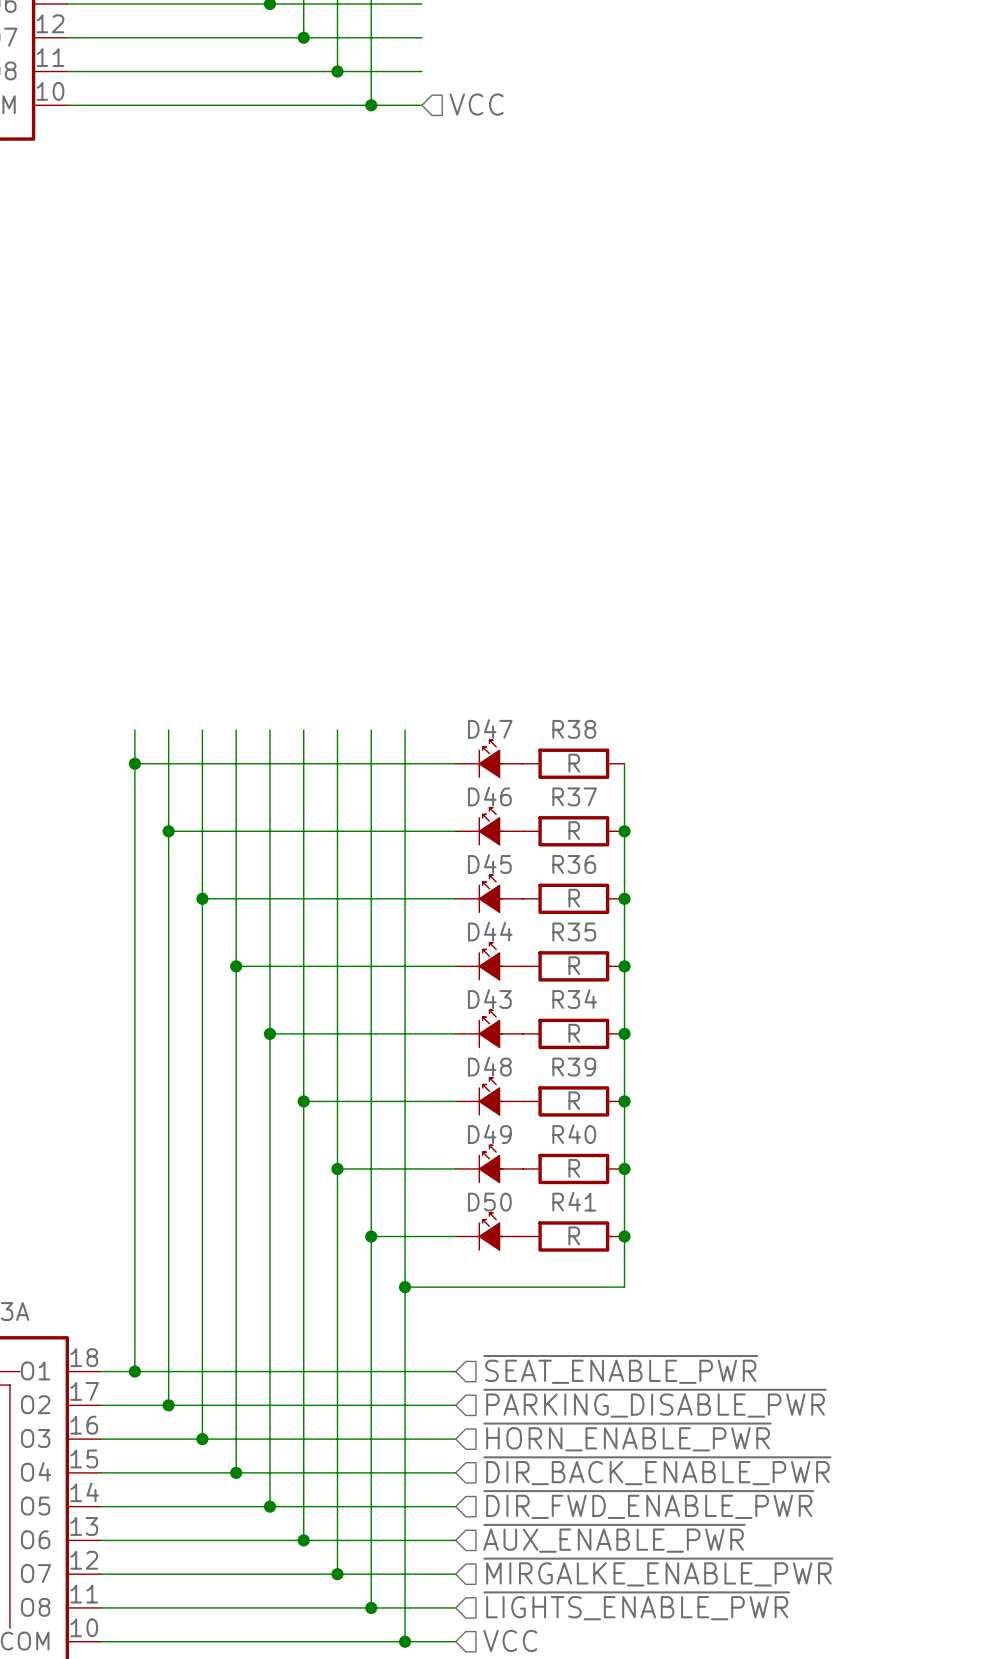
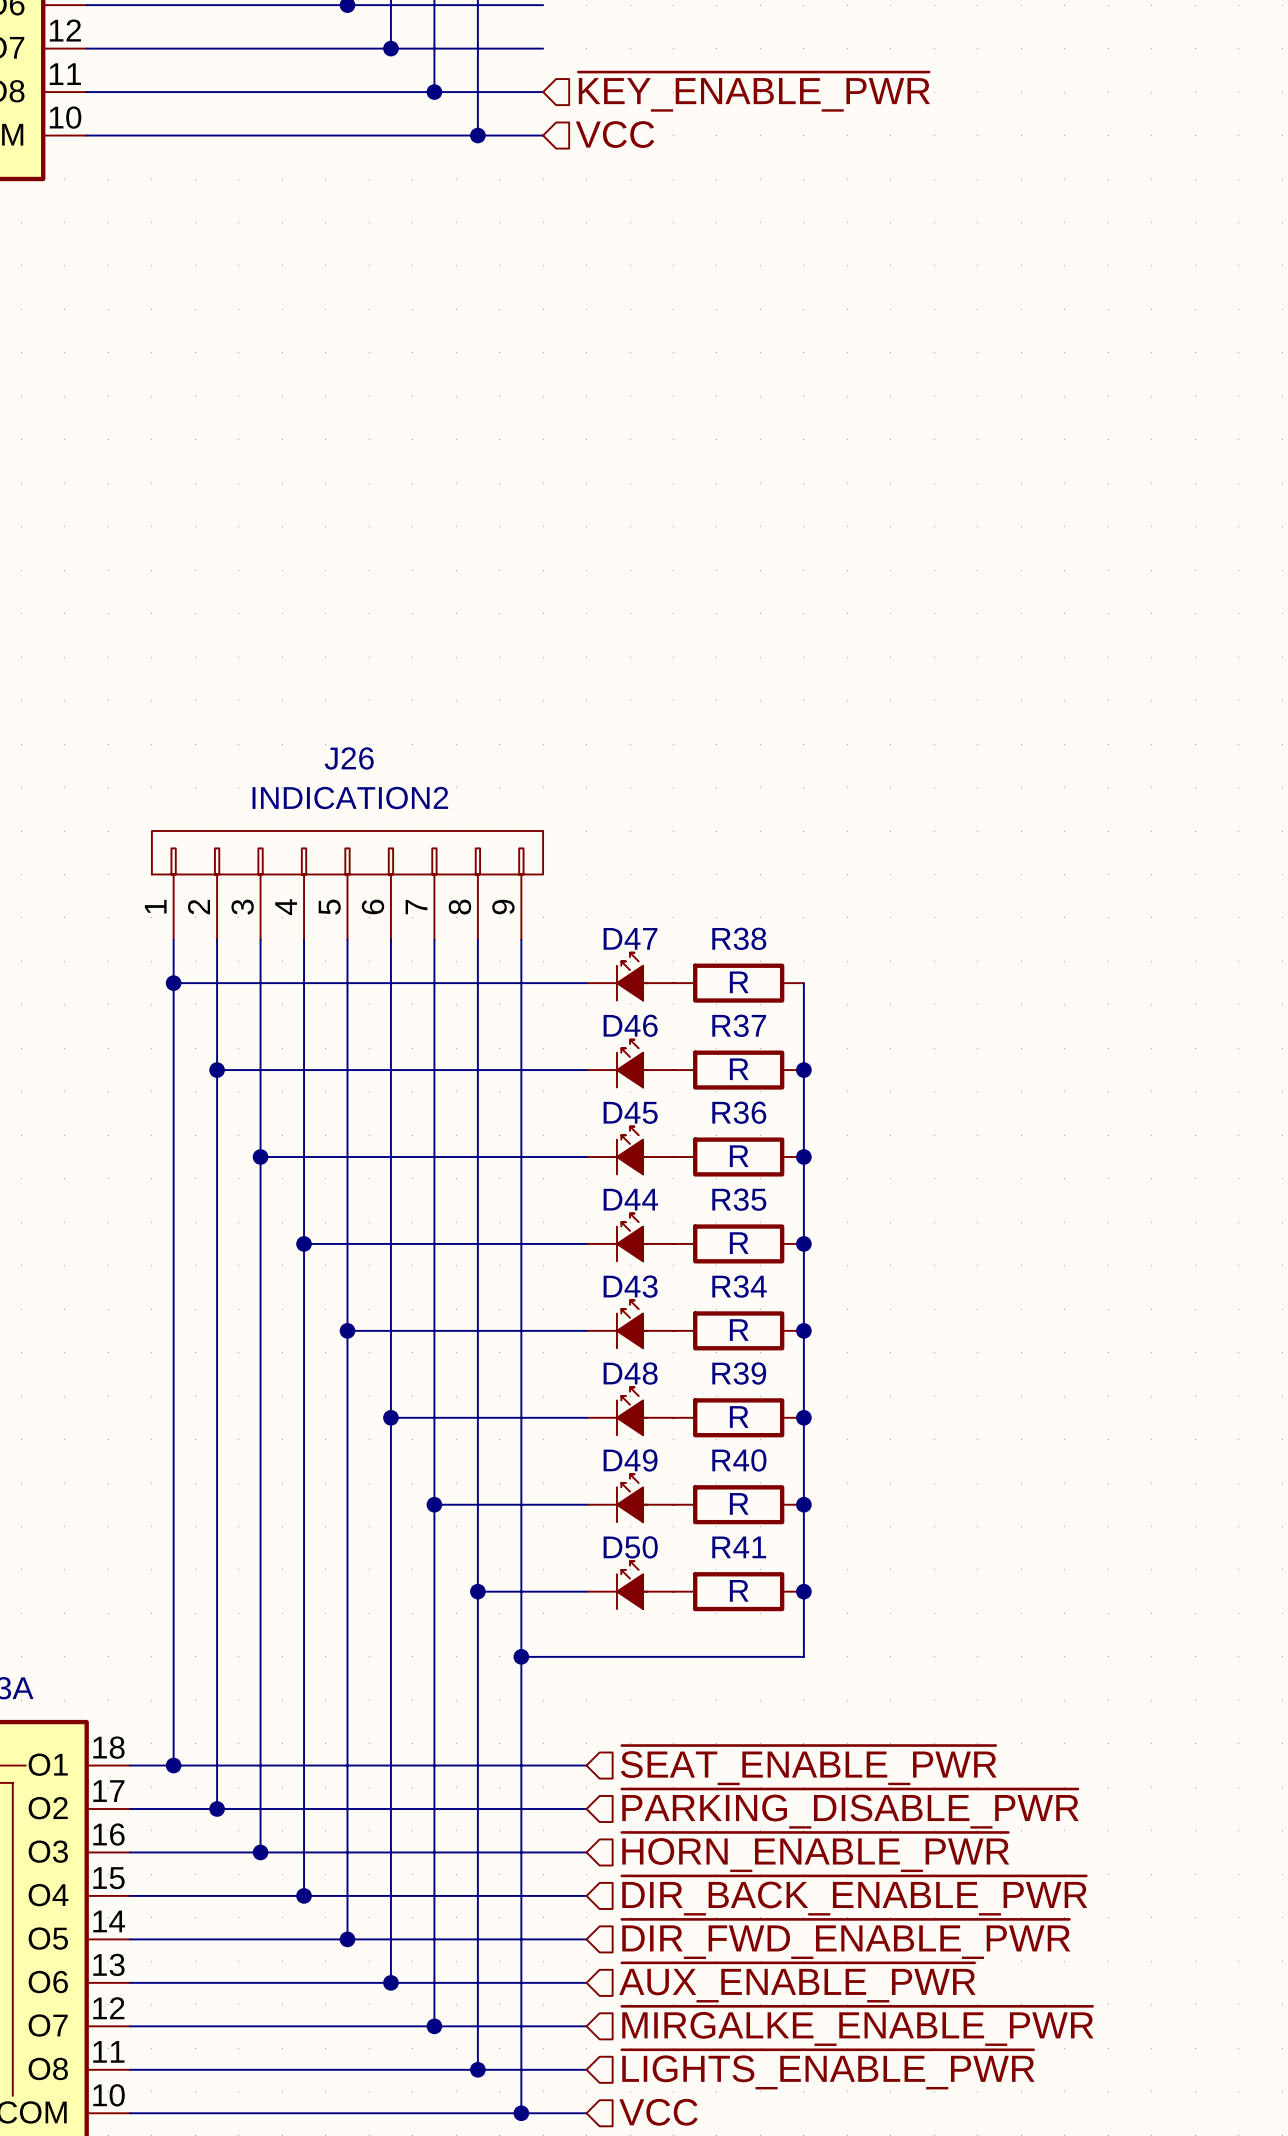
hierarchical label: none -> ~{KEY_ENABLE_PWR} (754, 91)
J26: none -> INDICATION2 (347, 885)

